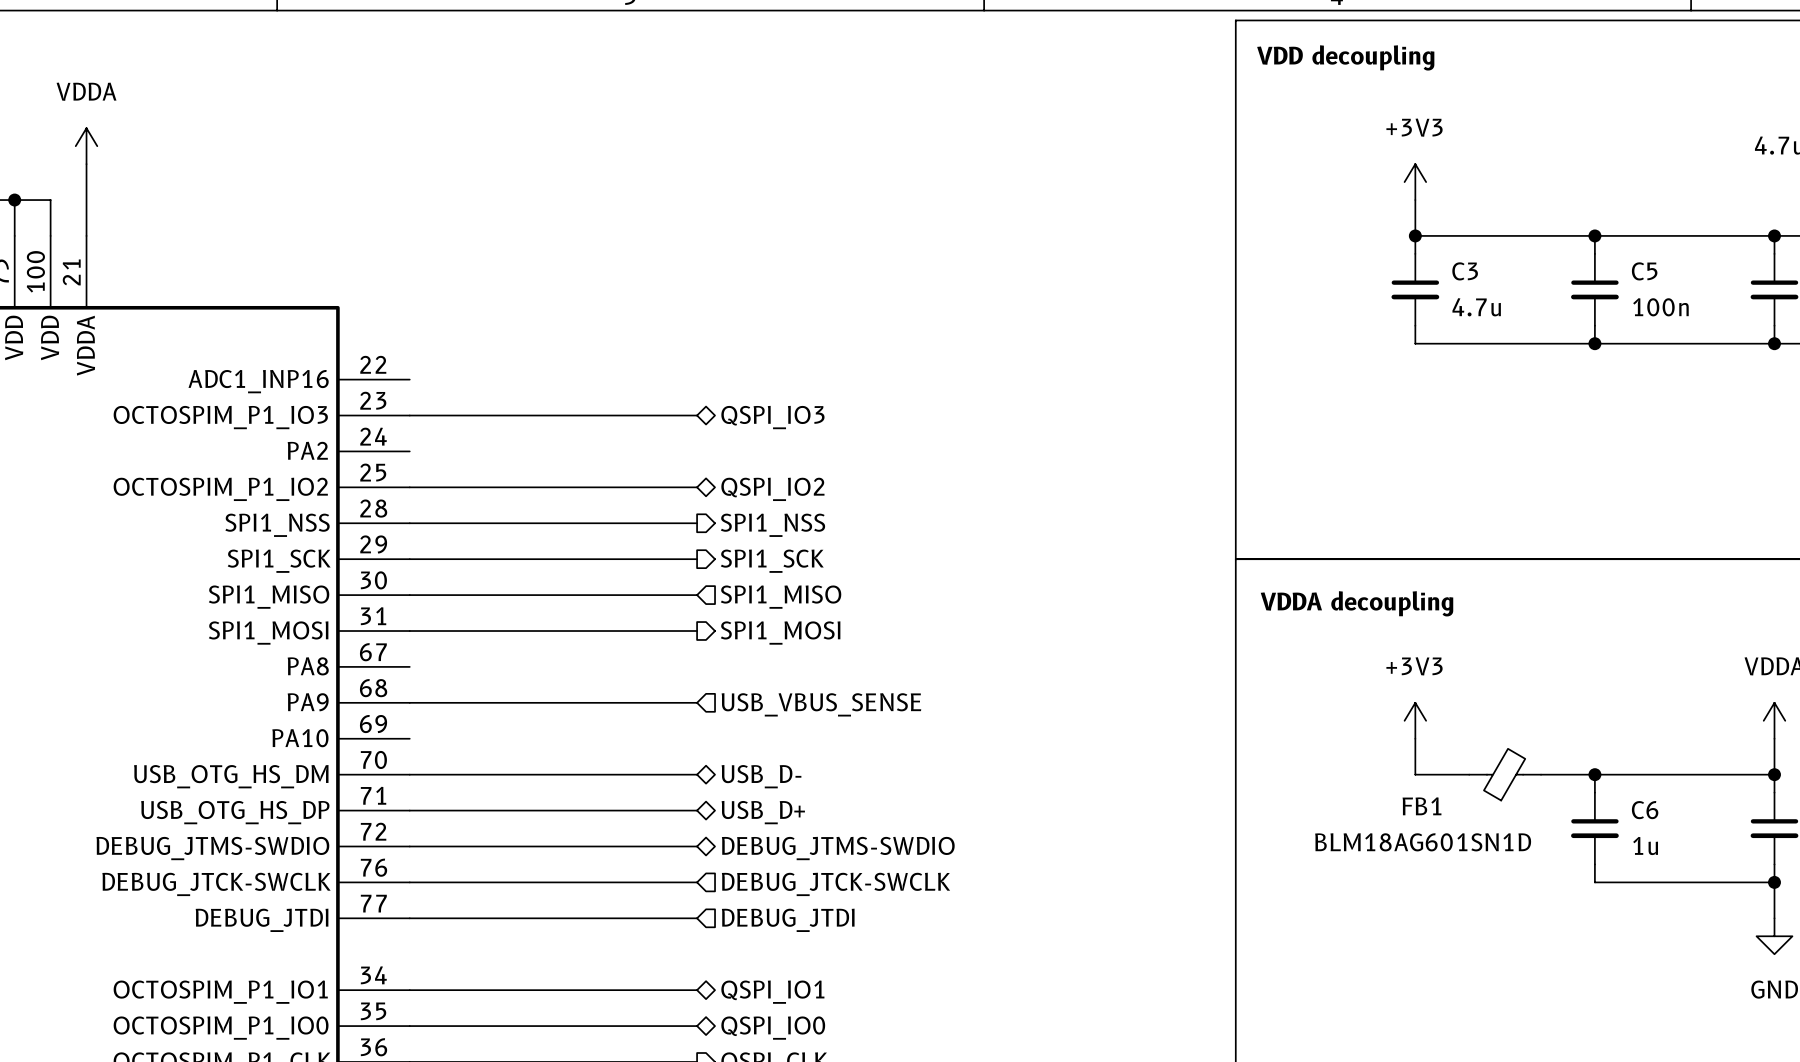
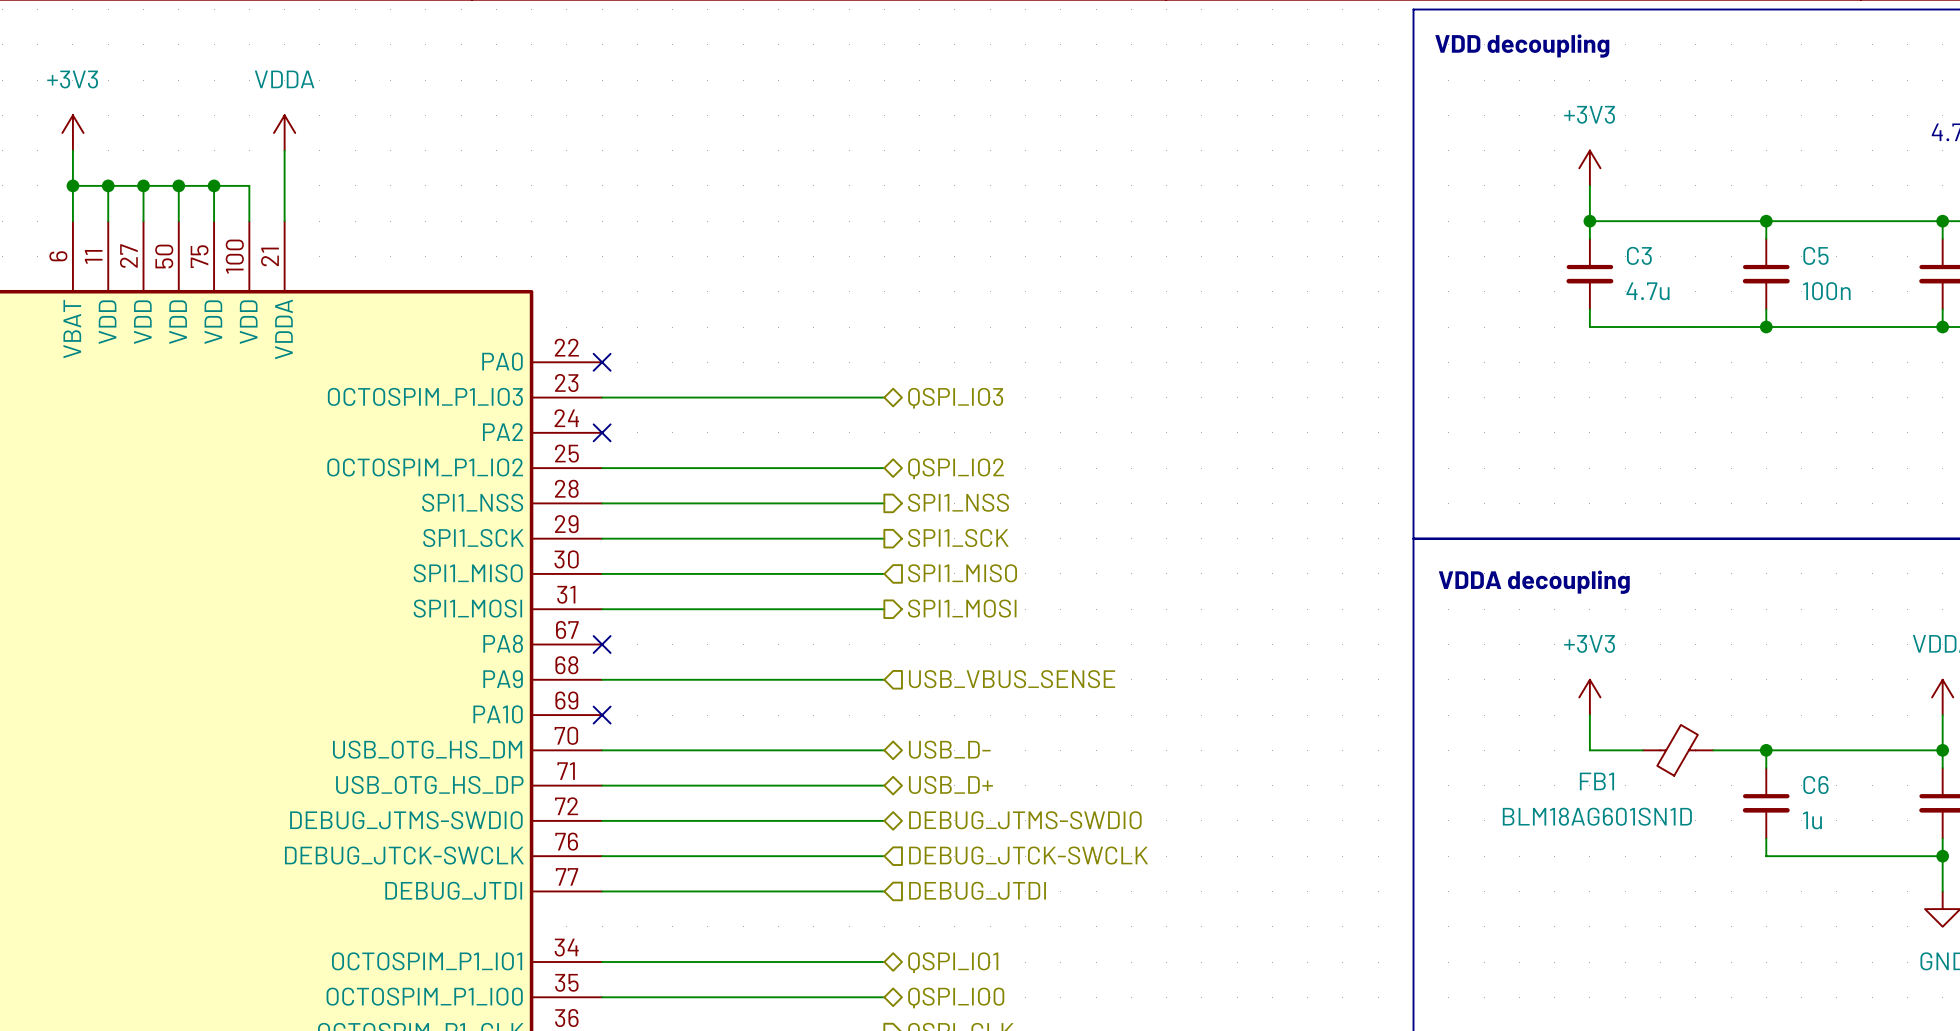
no-connect mark: none -> (602, 362)
part pin name: ADC1_INP16 (258, 381) -> PA0 (502, 361)
no-connect mark: none -> (602, 432)
no-connect mark: none -> (602, 644)
no-connect mark: none -> (602, 715)

